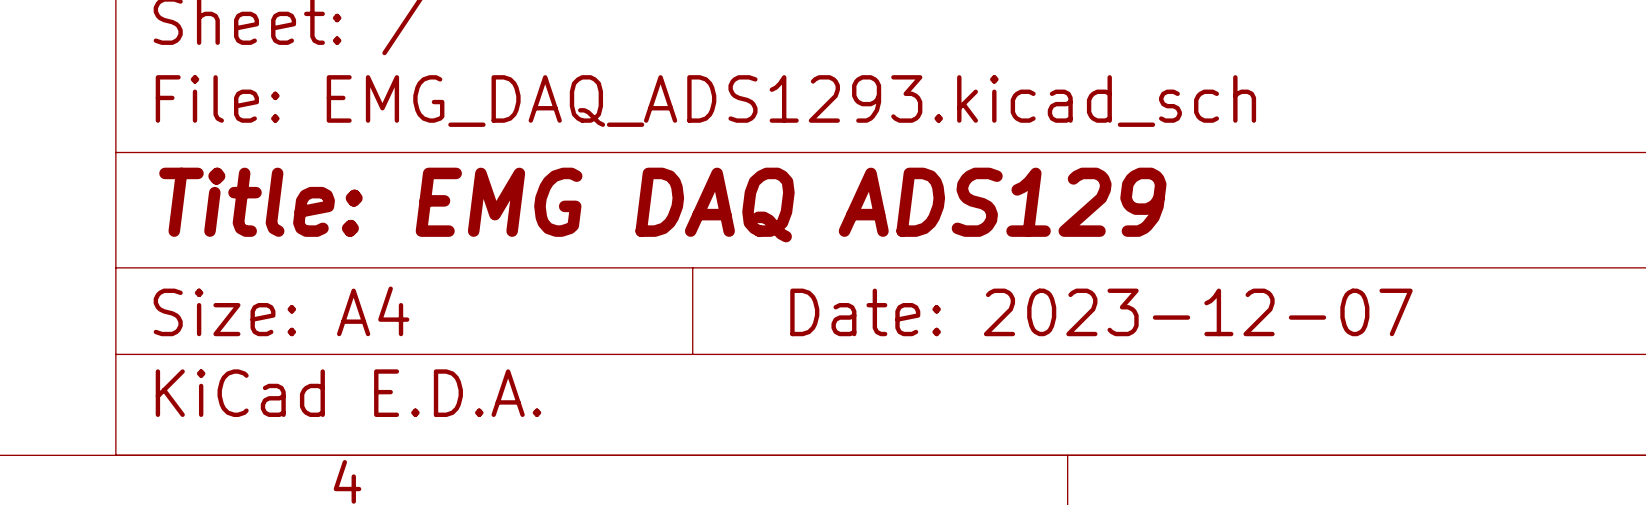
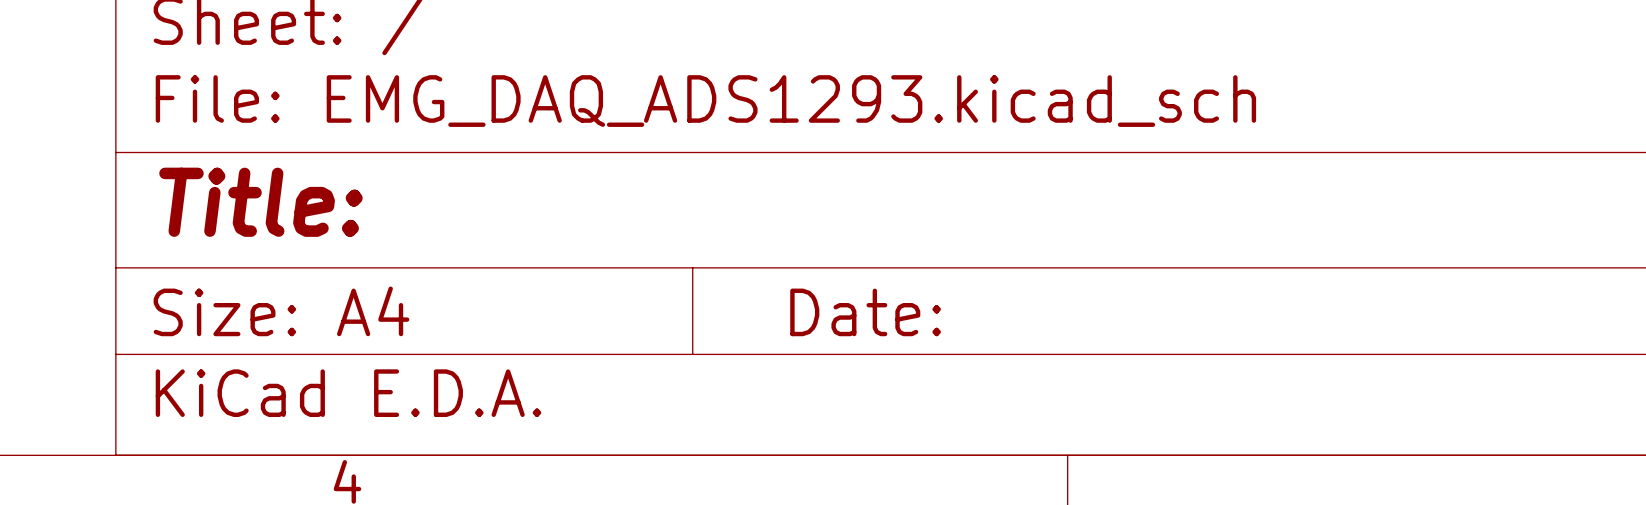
title block: Title: EMG DAQ ADS129 (662, 205) -> Title: (260, 202)
title block: Date: 2023-12-07 (1101, 312) -> Date: (865, 312)

